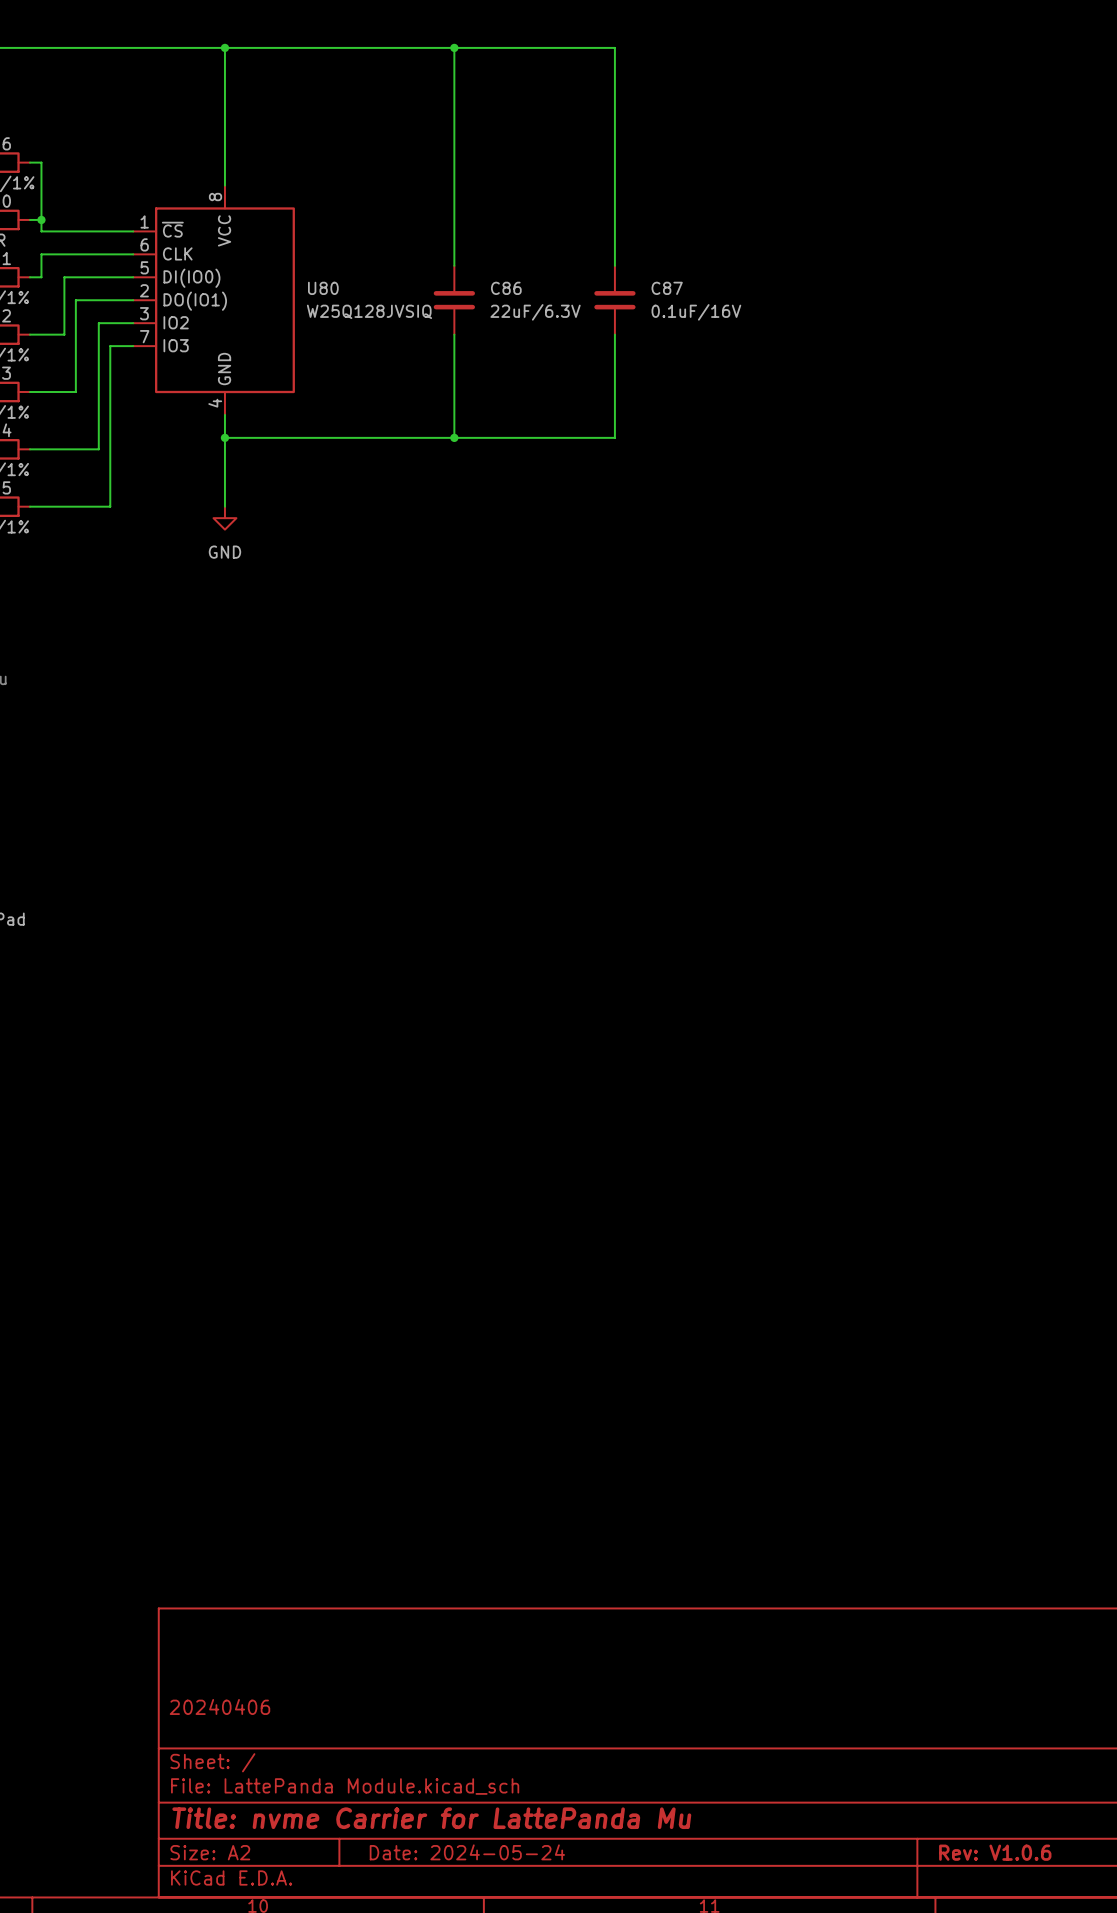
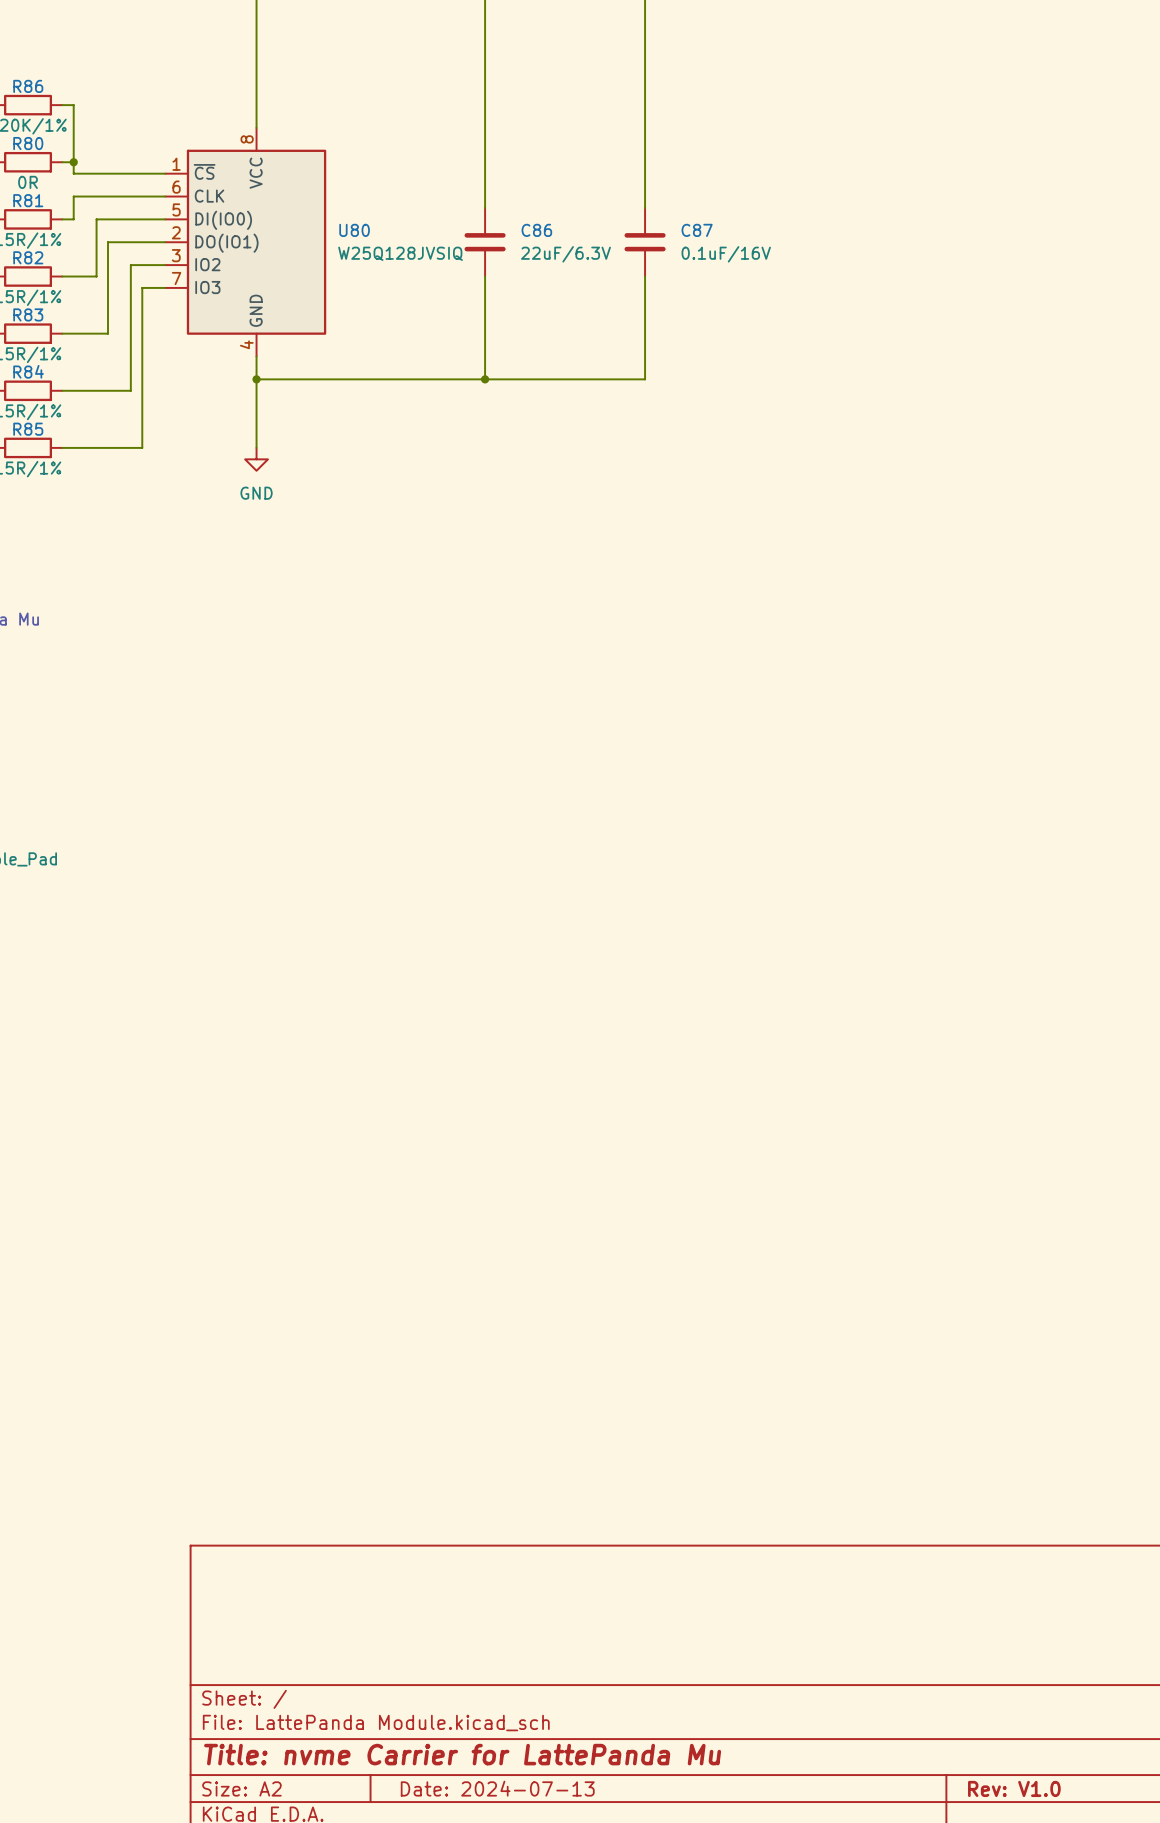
title block: 20240406 (219, 1706) -> none
title block: Date: 2024-05-24 (467, 1852) -> Date: 2024-07-13 (497, 1788)
title block: Rev: V1.0.6 (995, 1852) -> Rev: V1.0 (1014, 1788)

